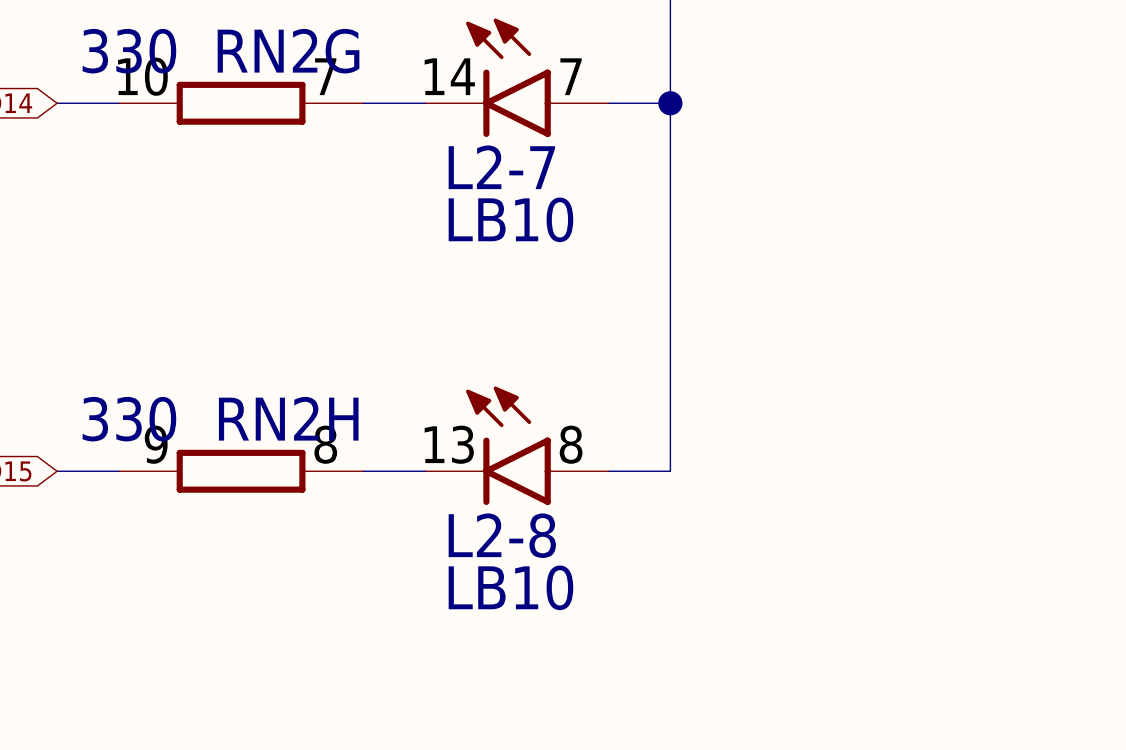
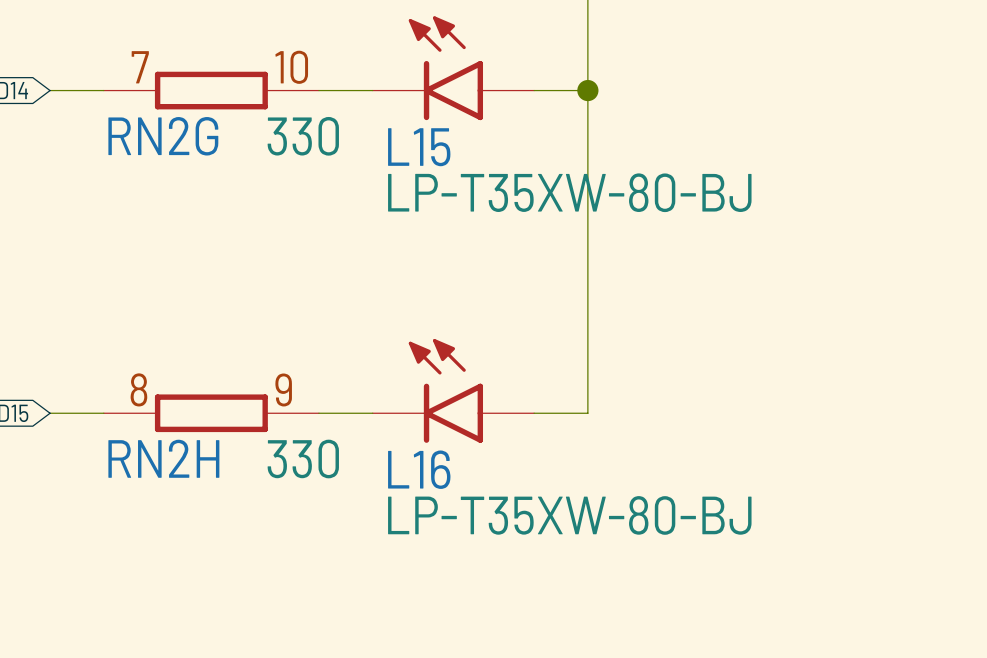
L2-7 pin number: 14 (449, 76) -> none
L2-7 pin number: 7 (571, 76) -> none
RN2G rotation: 0° (241, 103) -> 180° (211, 90)
L2-7 name: L2-7 (501, 167) -> L15 (419, 147)
L2-7 value: LB10 (510, 219) -> LP-T35XW-80-BJ (569, 192)
L2-8 pin number: 13 (449, 444) -> none
L2-8 pin number: 8 (571, 444) -> none
RN2H rotation: 0° (241, 471) -> 180° (211, 413)
L2-8 name: L2-8 (502, 535) -> L16 (419, 469)
L2-8 value: LB10 (510, 587) -> LP-T35XW-80-BJ (569, 515)

